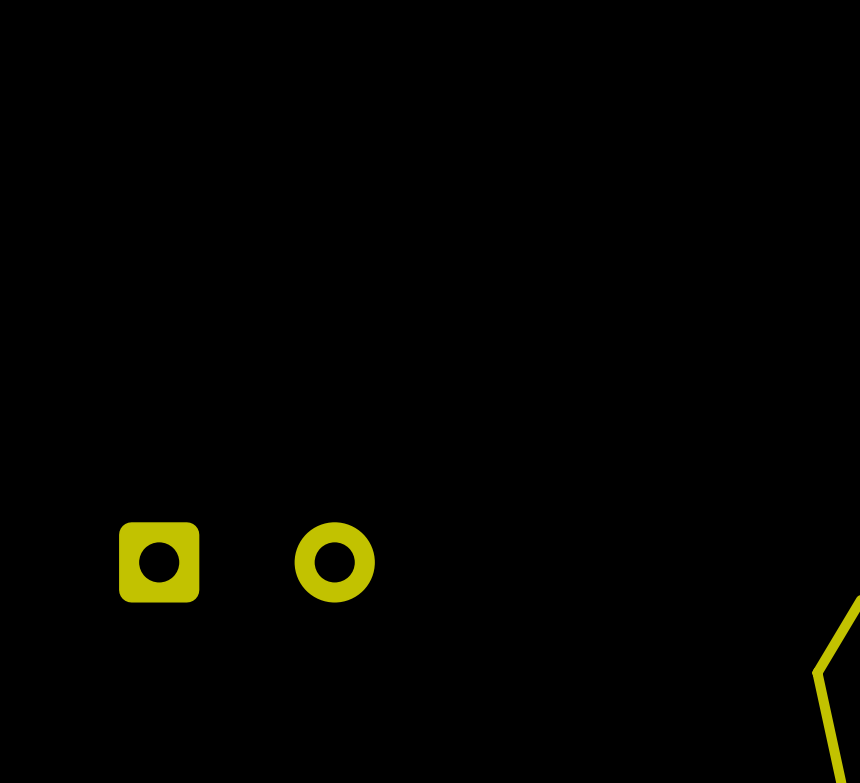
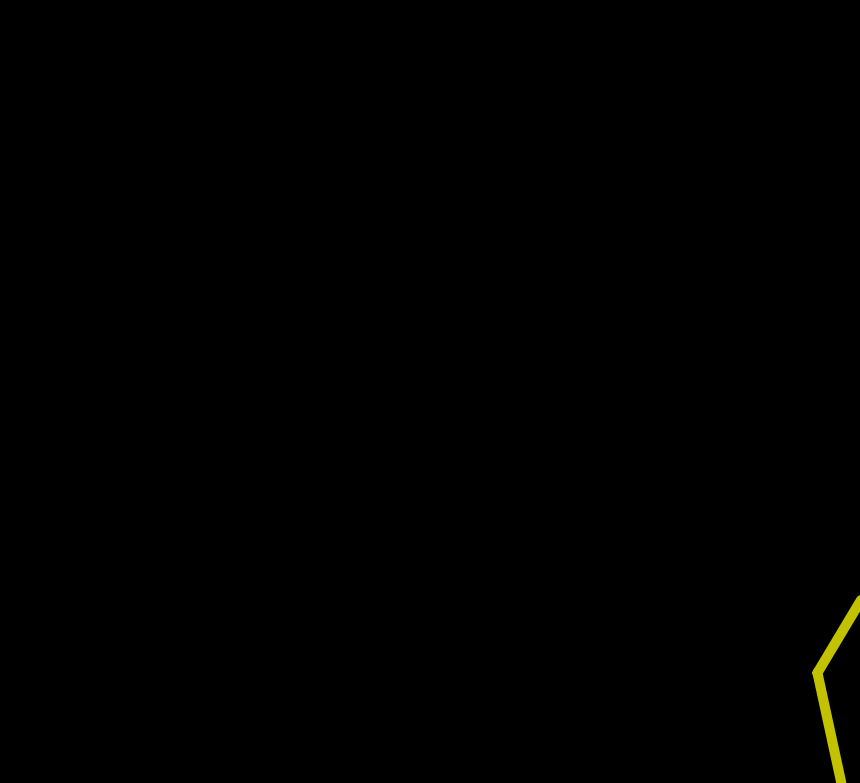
part: (246, 562) -> none

